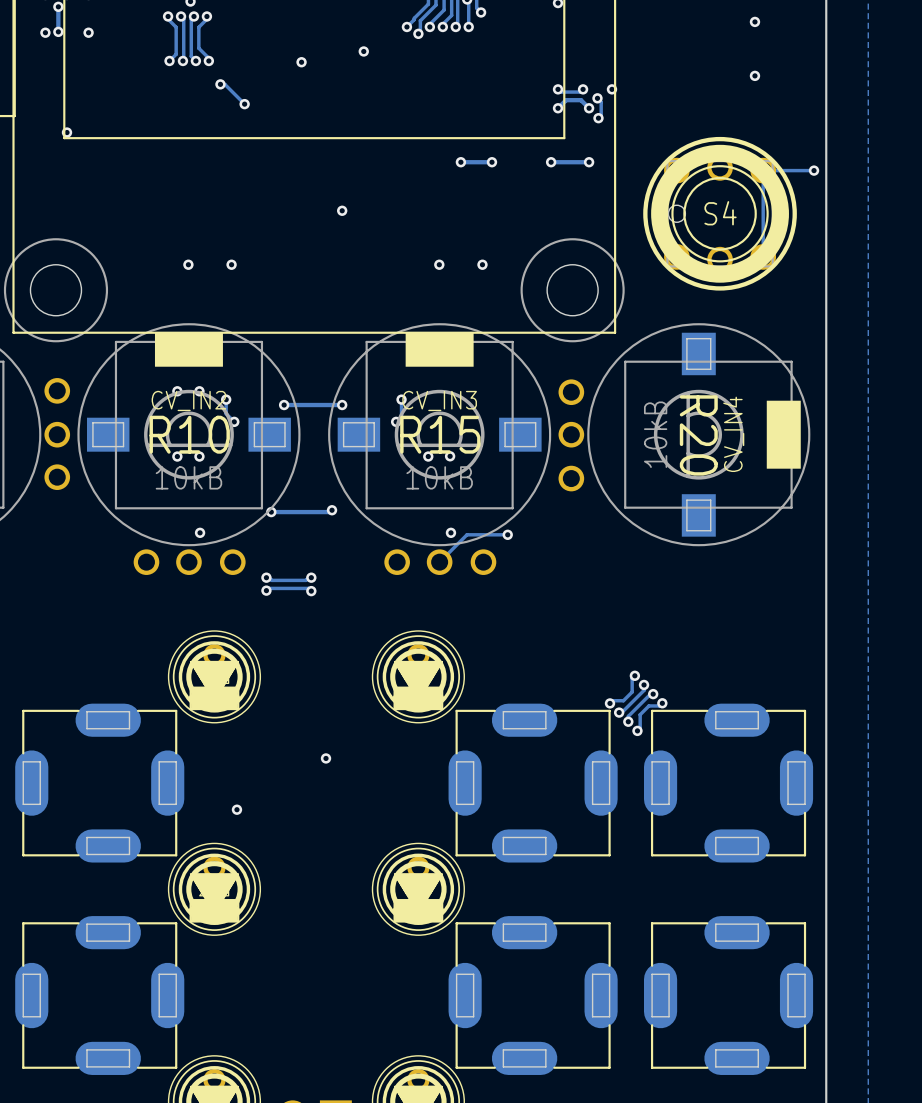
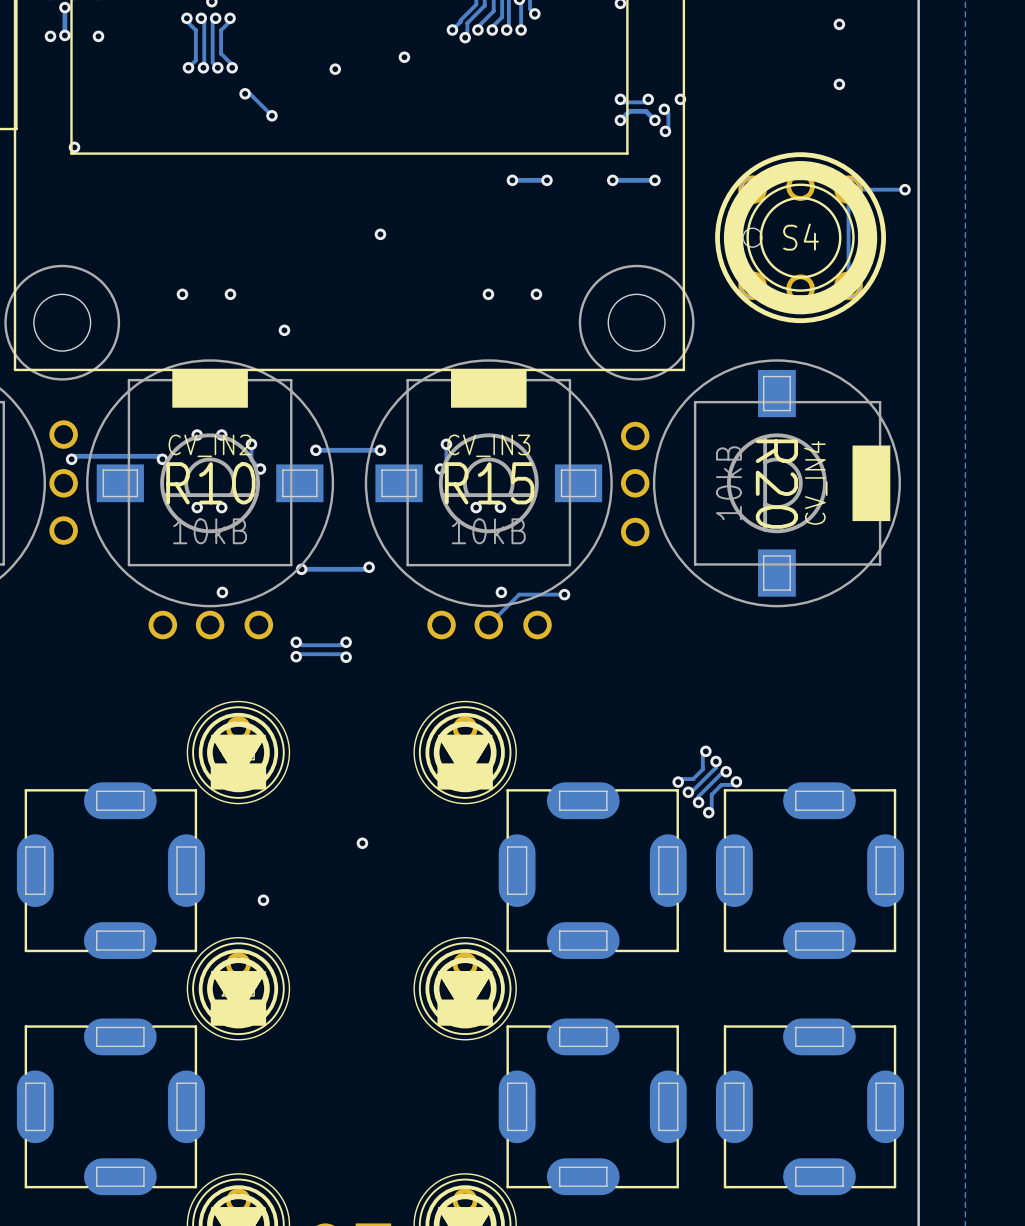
via: none -> (182, 294)
via: (188, 264) -> none
via: none -> (230, 294)
via: (231, 264) -> none
via: none -> (284, 330)
via: none -> (71, 459)
track: none -> (162, 459) (159, 456) (74, 456) (71, 459)
via: none -> (162, 459)

